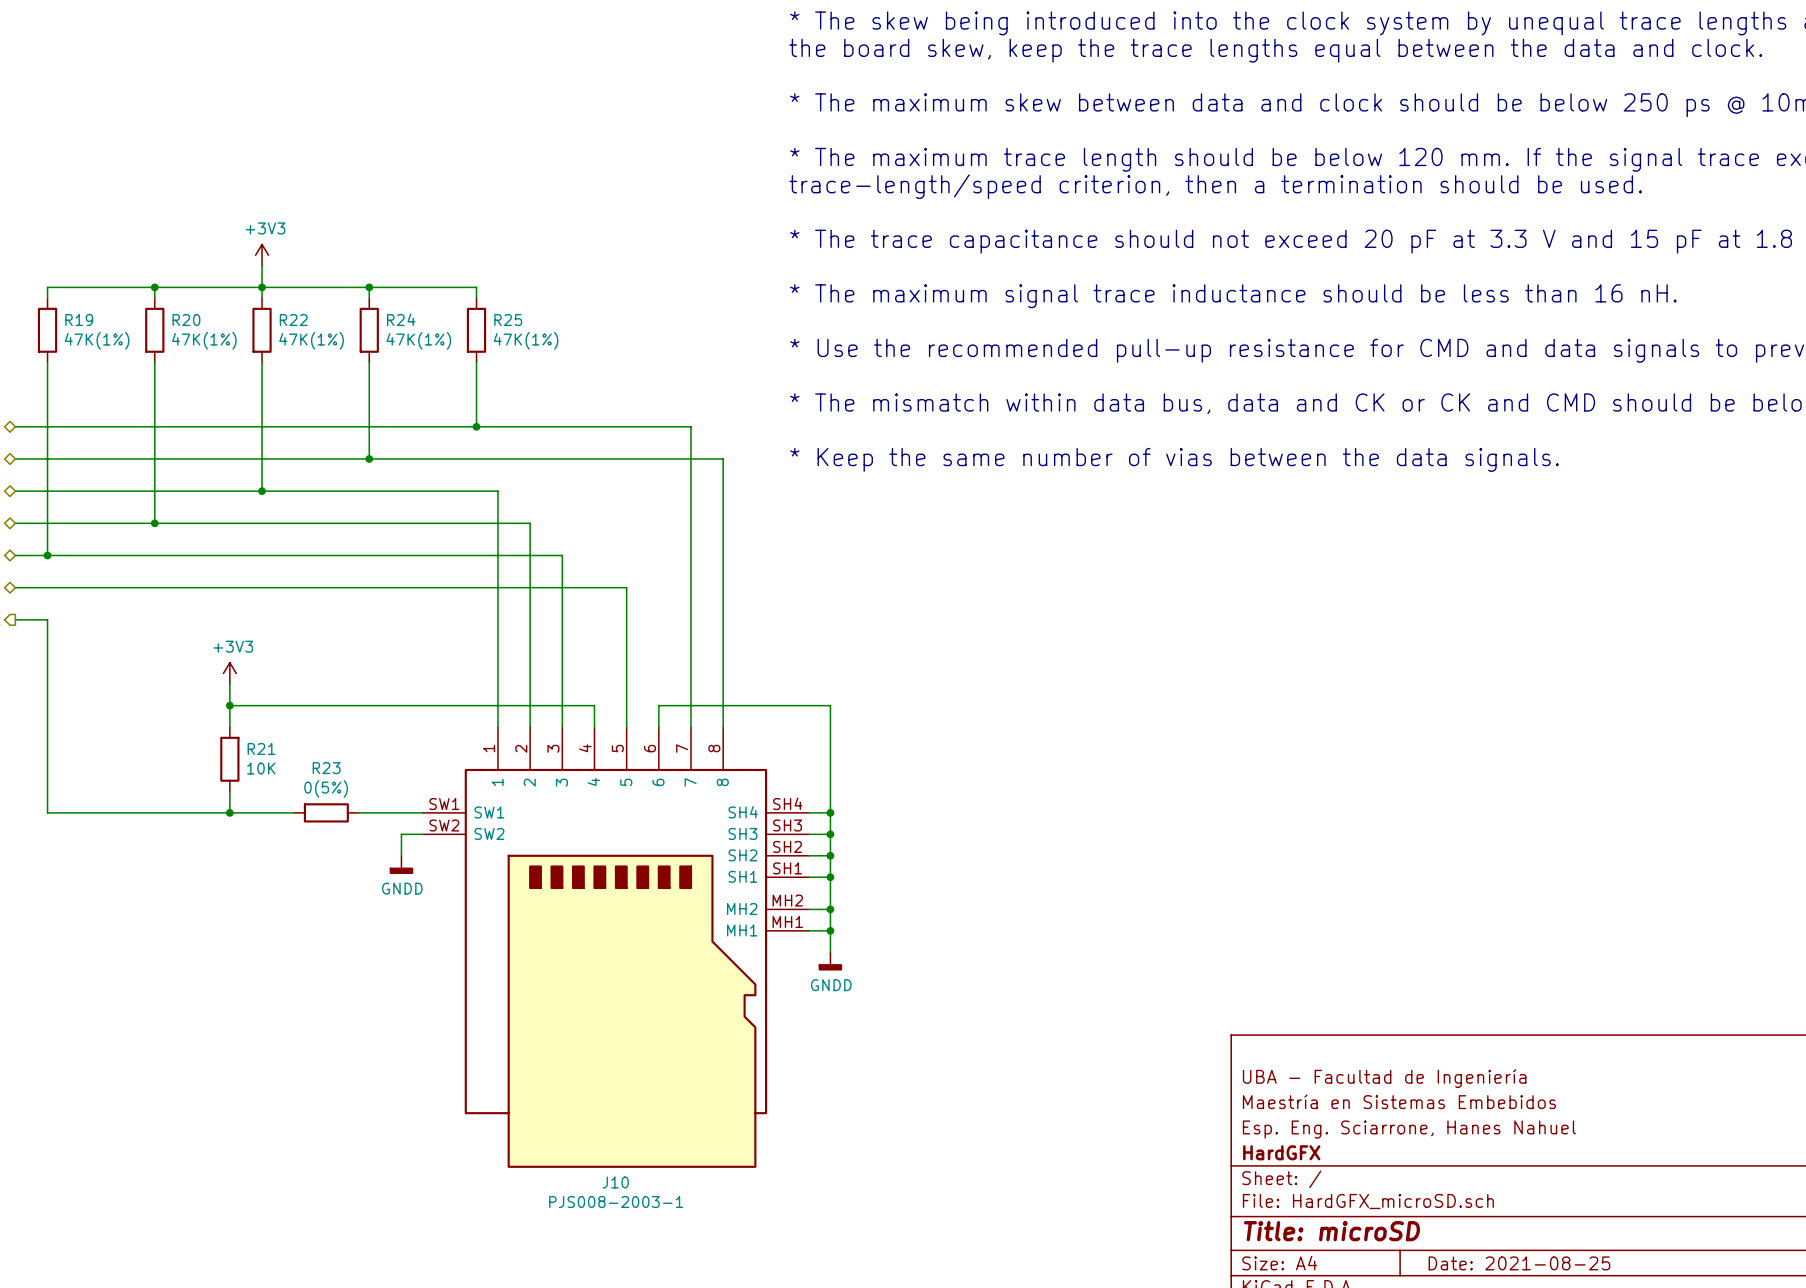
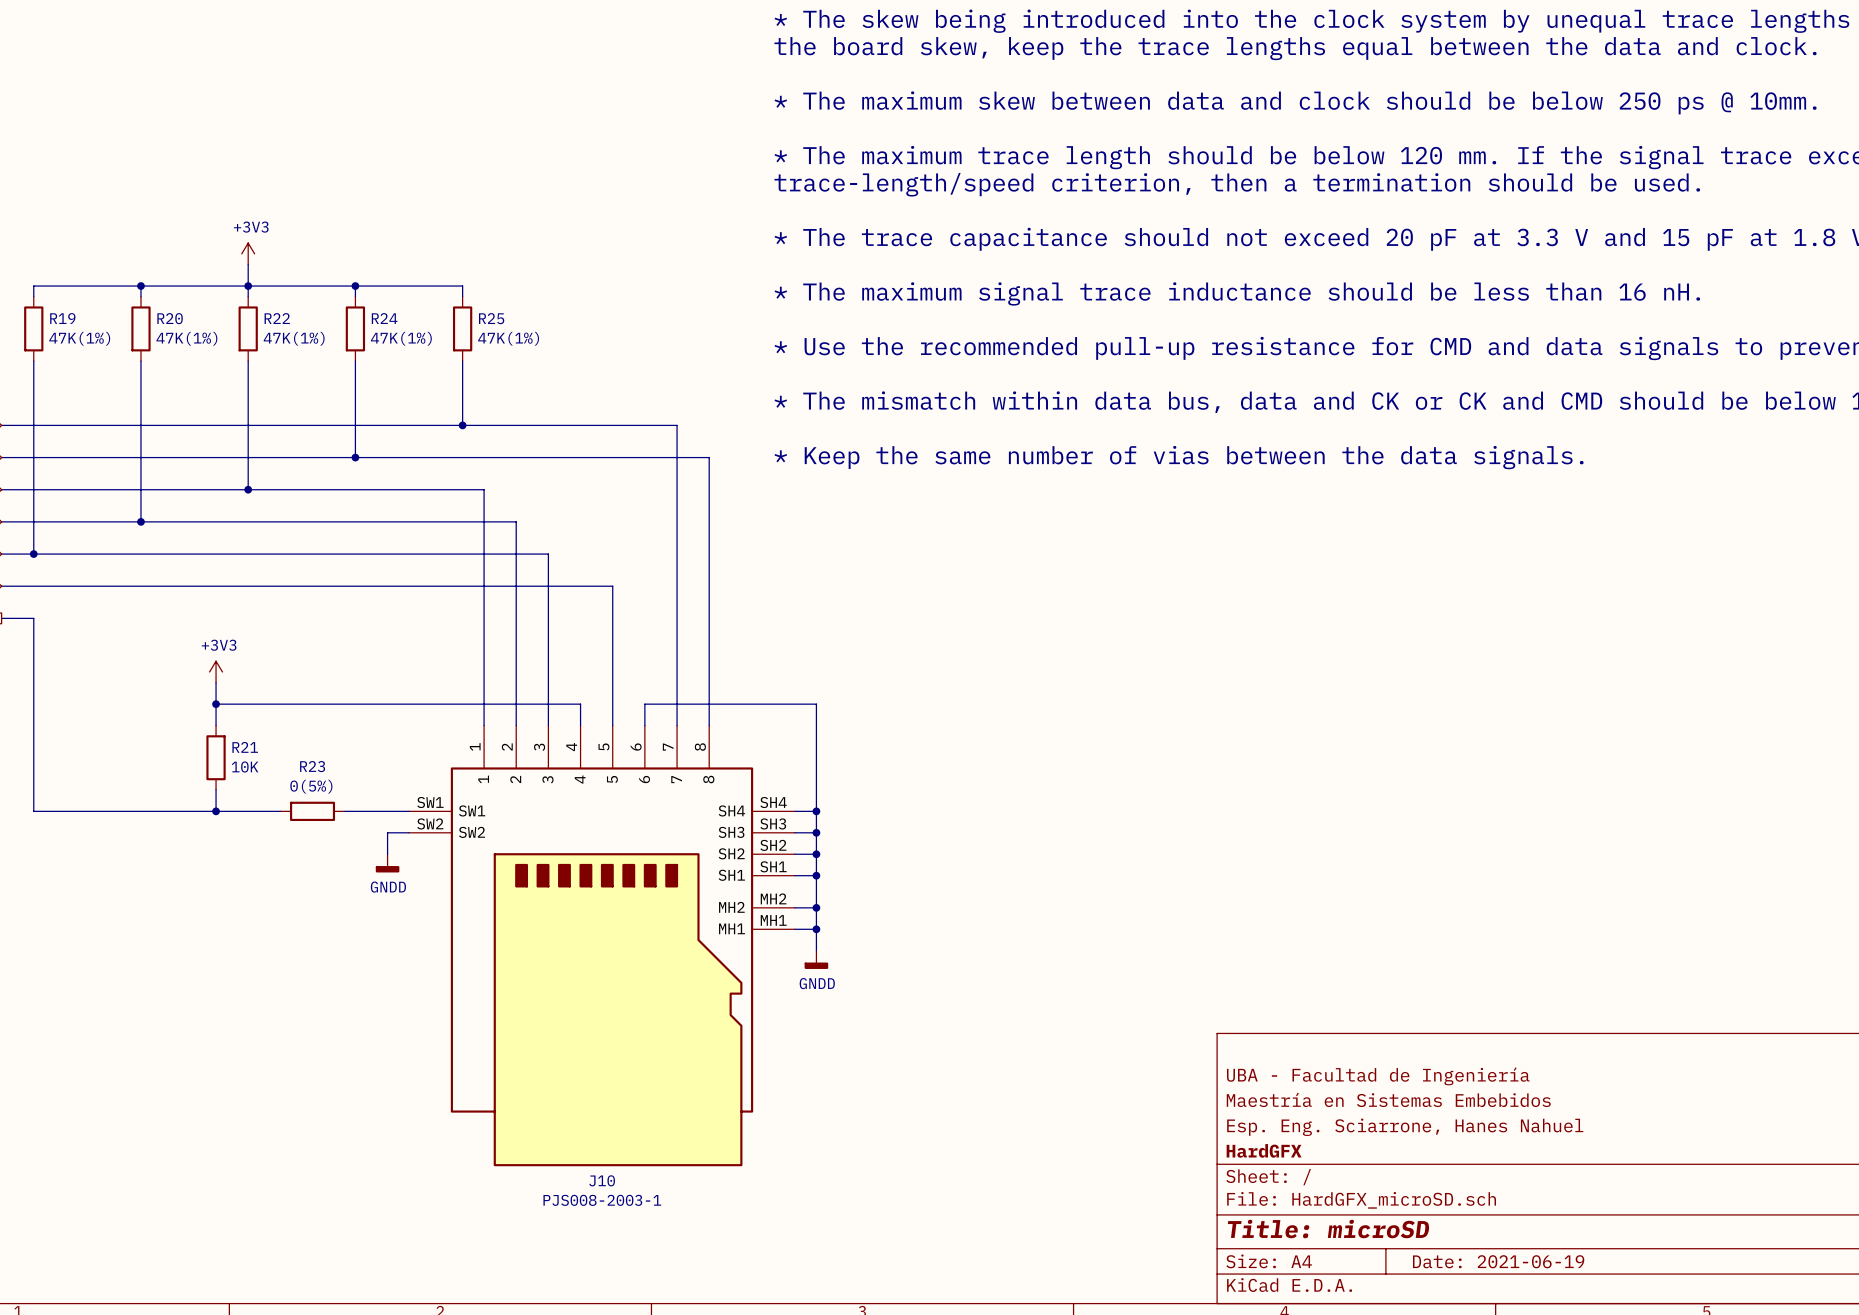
title block: Date: 2021-08-25 (1519, 1263) -> Date: 2021-06-19 (1498, 1261)

